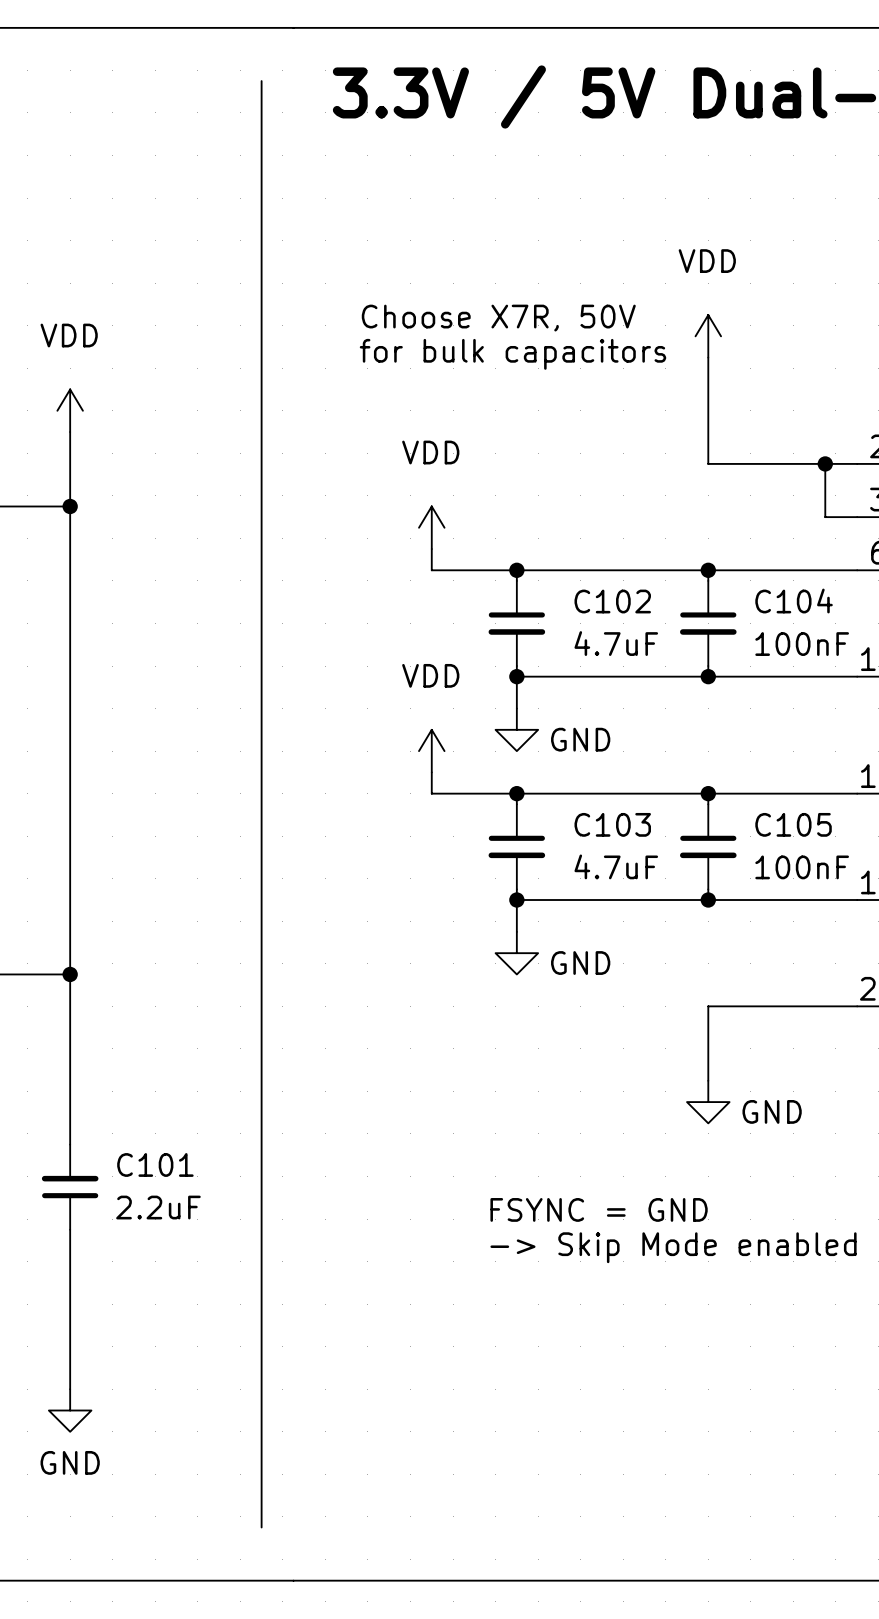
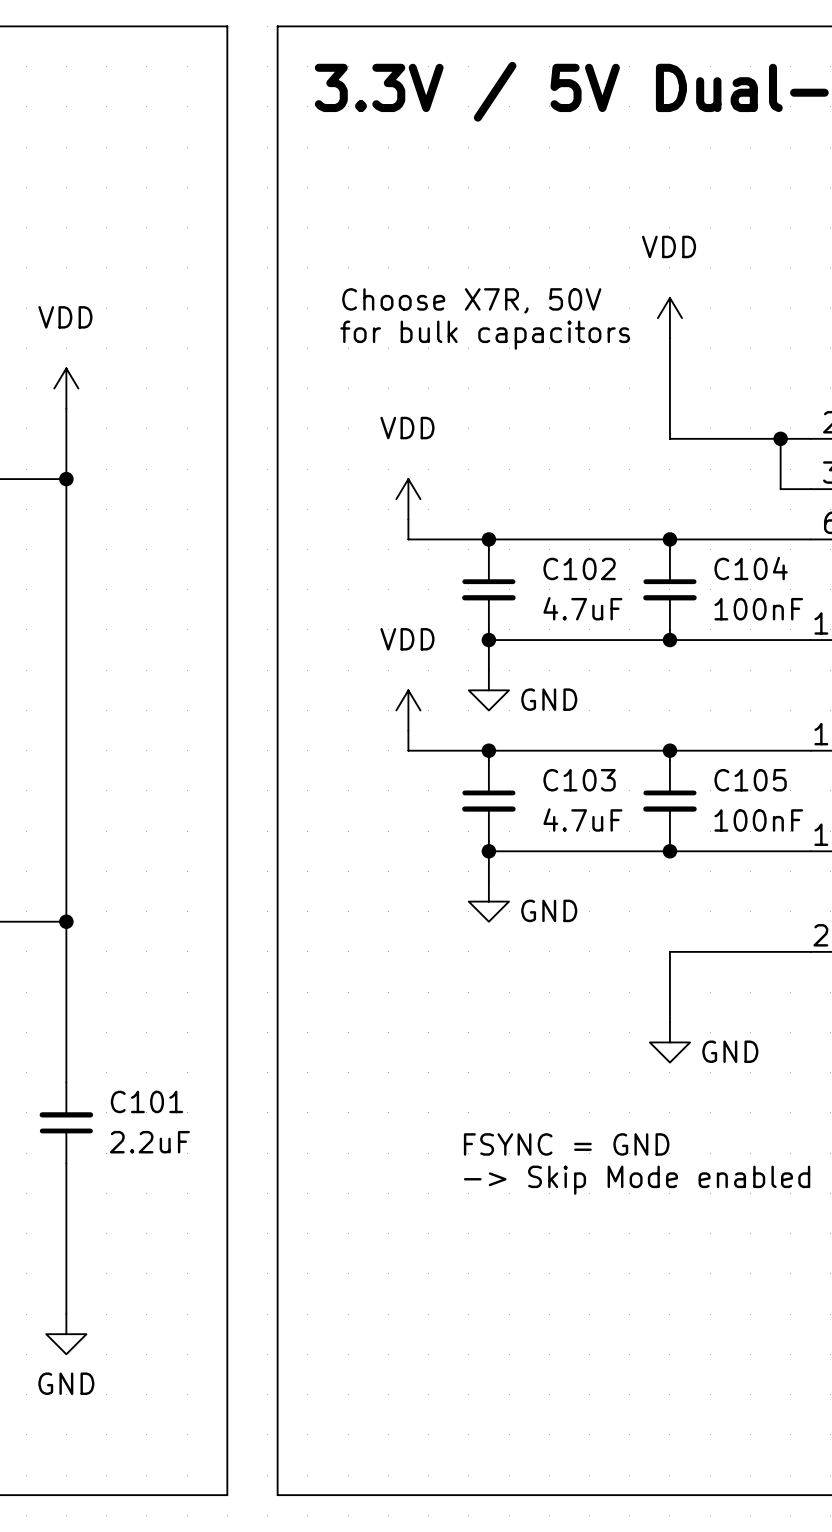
line: (240, 27) (293, 27) -> (227, 26) (227, 1495)
line: (261, 81) (261, 1527) -> none
line: (240, 1580) (293, 1580) -> (277, 26) (277, 1495)

